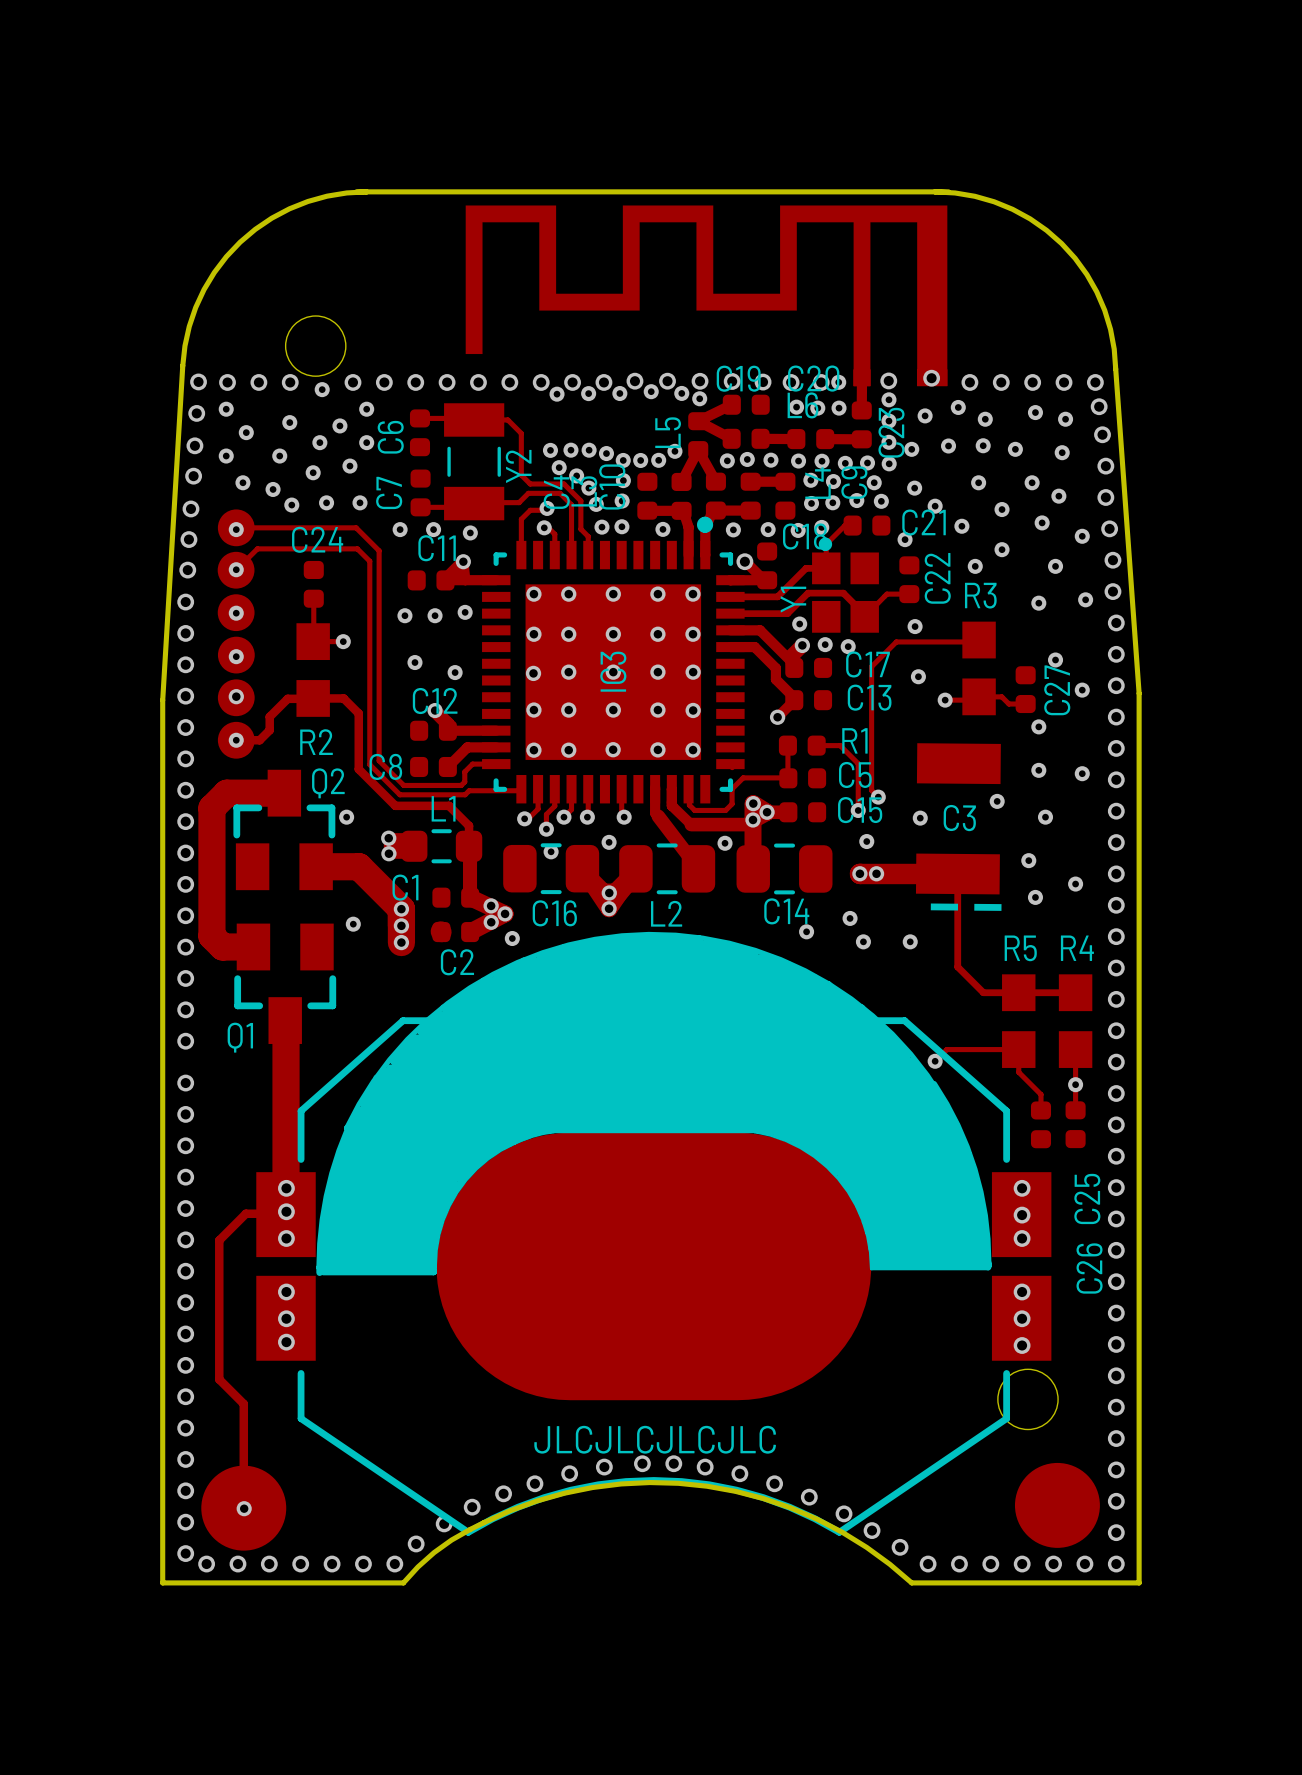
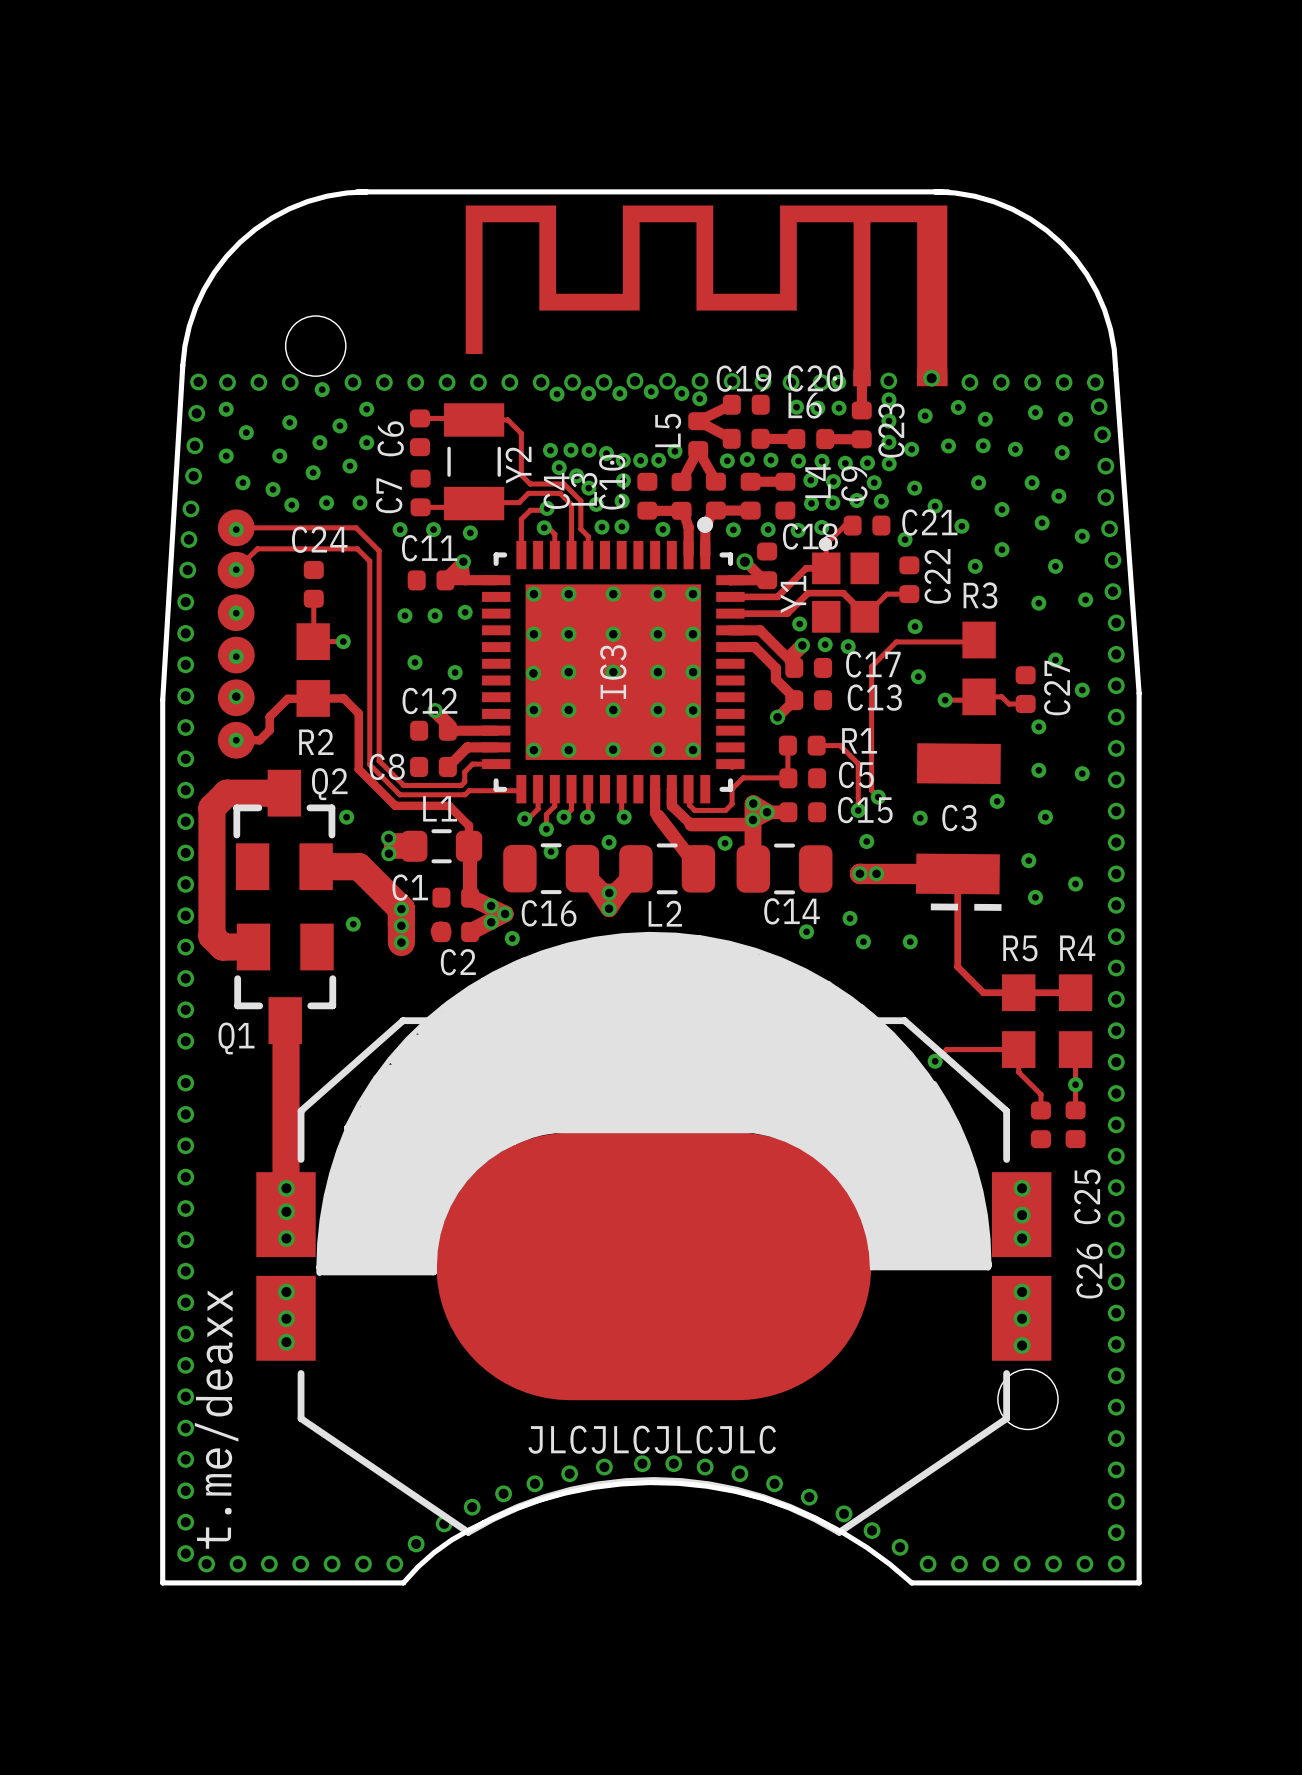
track: (286, 1213) (245, 1213) (219, 1240) (219, 1379) (243, 1403) (243, 1508) -> none
text: none -> t.me/deaxx (216, 1419)
part: (1057, 1505) -> none
part: (243, 1508) -> none
via: (244, 1508) -> none

